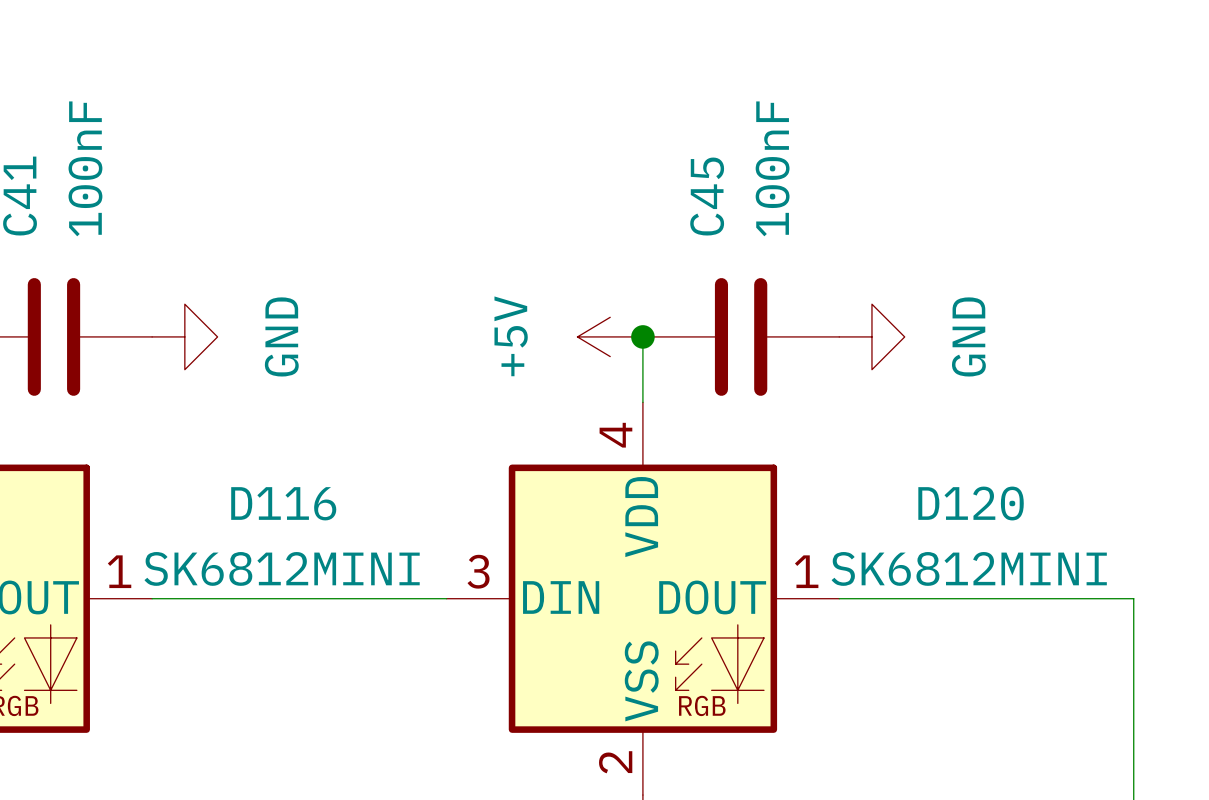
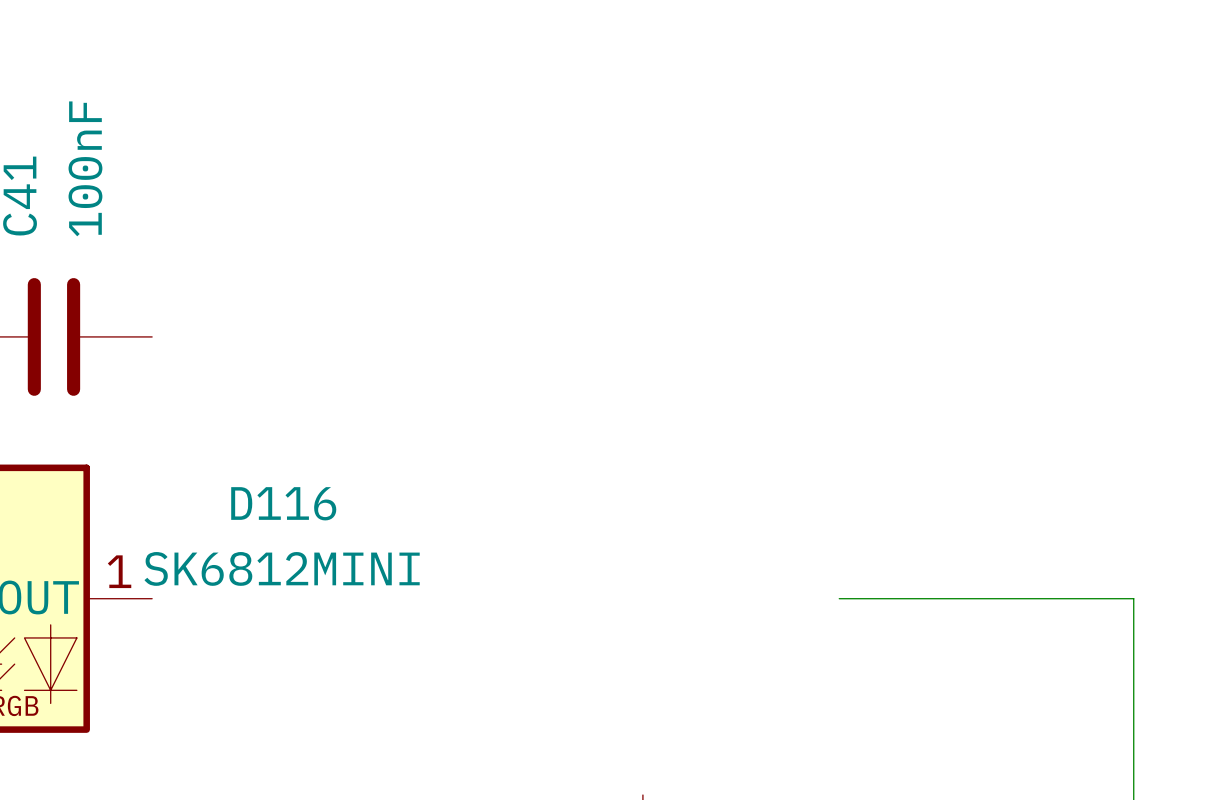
power symbol: GND (184, 336) -> none
power symbol: +5V (610, 336) -> none
wire: (642, 336) (642, 402) -> none
junction: (642, 336) -> none
C45: 100nF (741, 336) -> none
power symbol: GND (871, 336) -> none
wire: (152, 598) (446, 598) -> none
D120: SK6812MINI (642, 598) -> none

